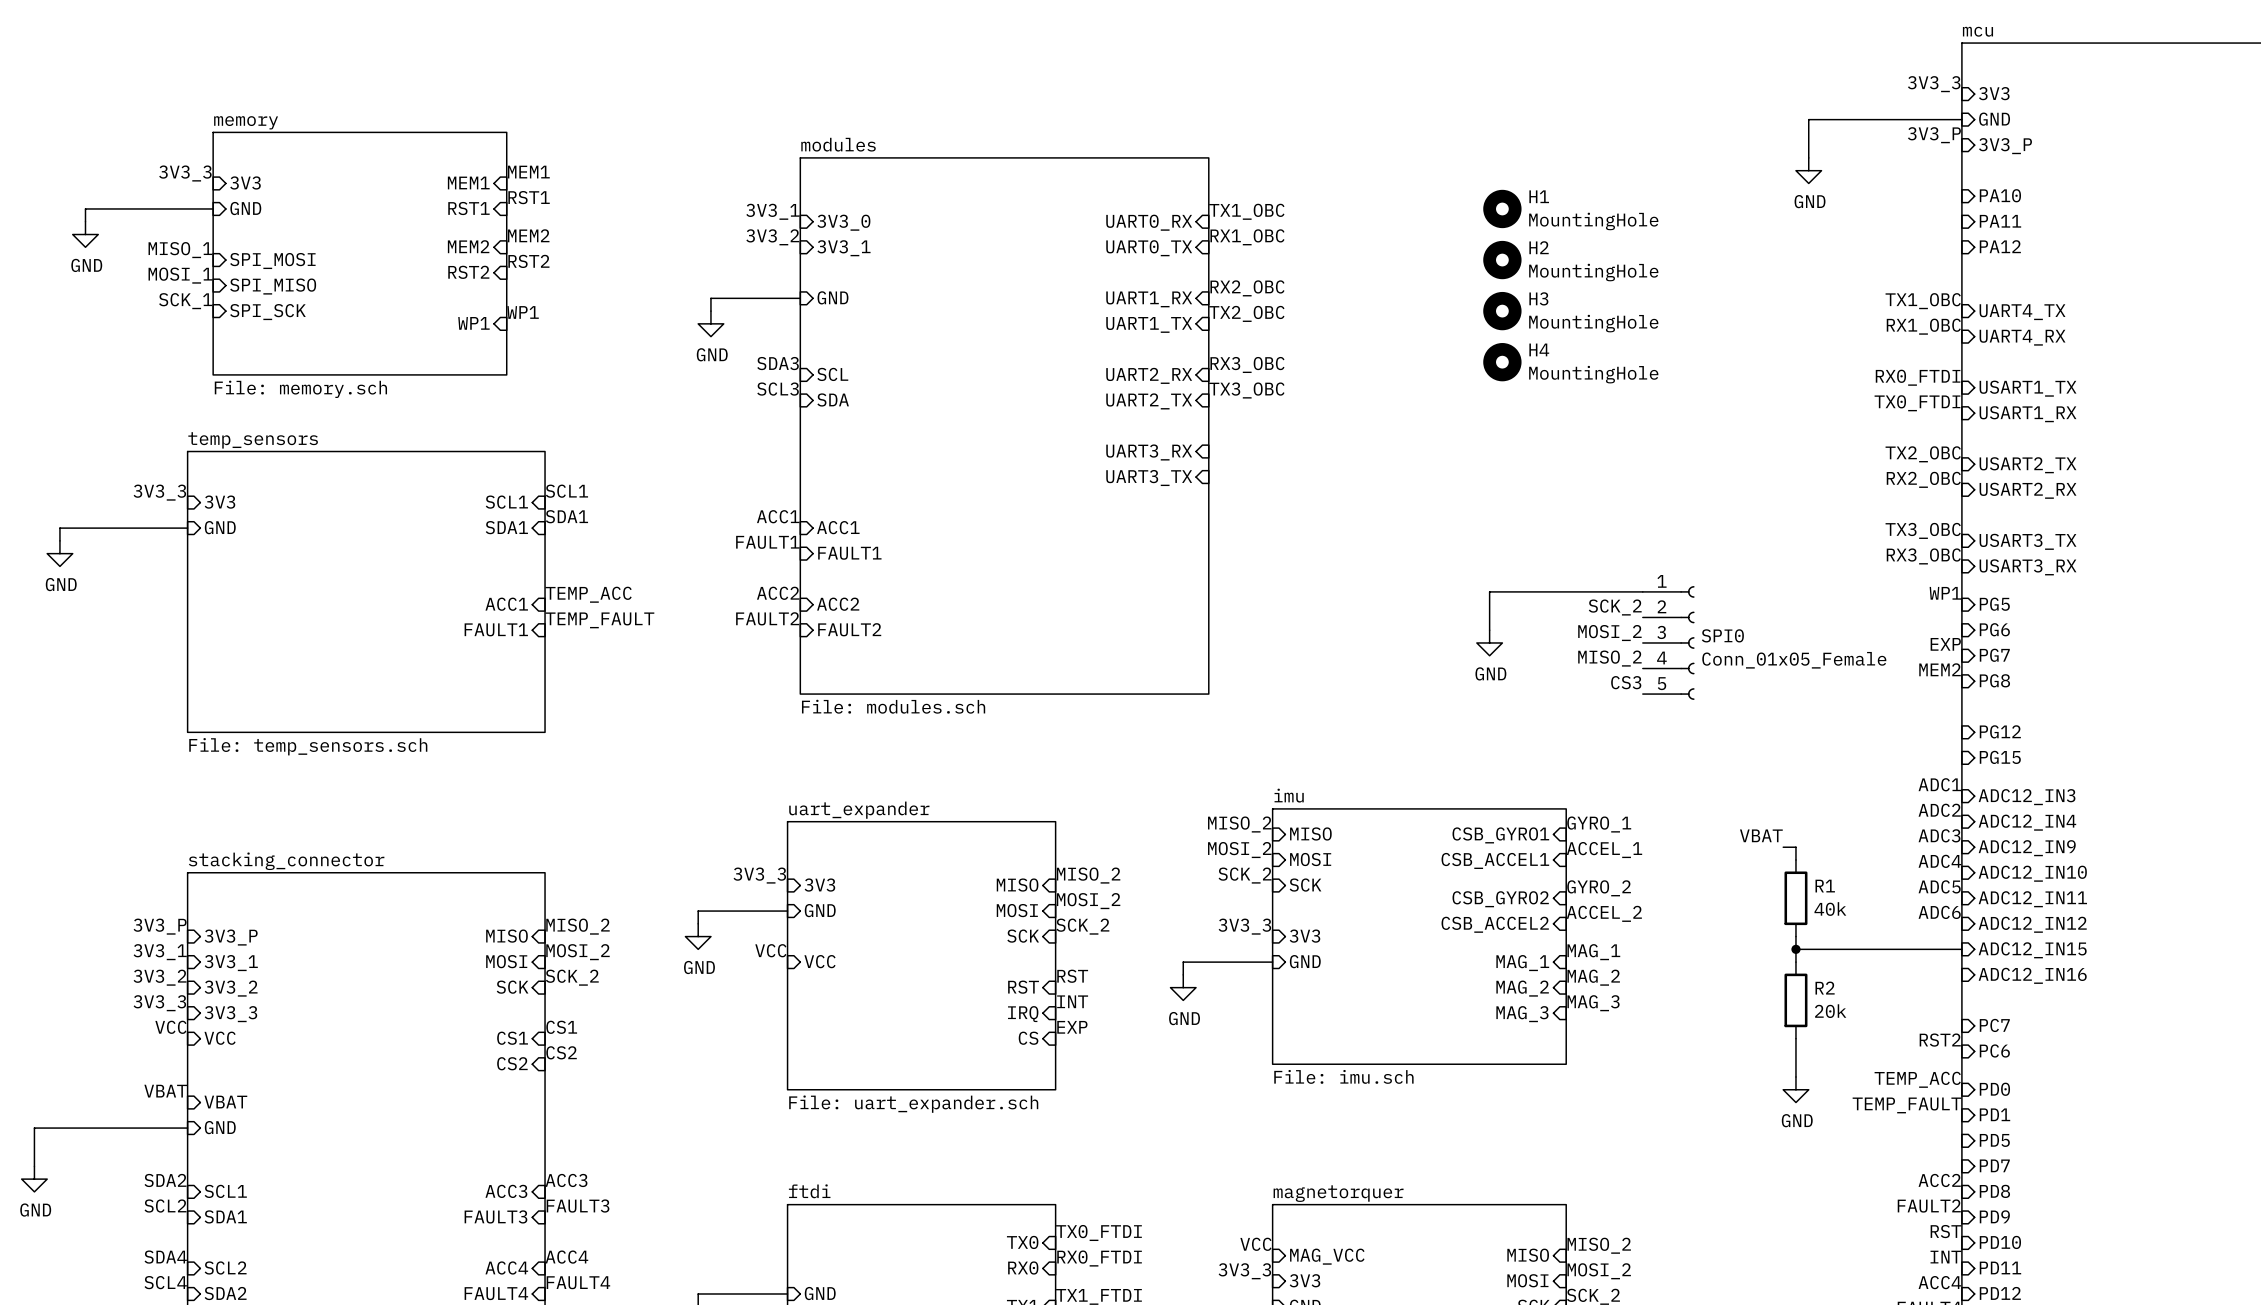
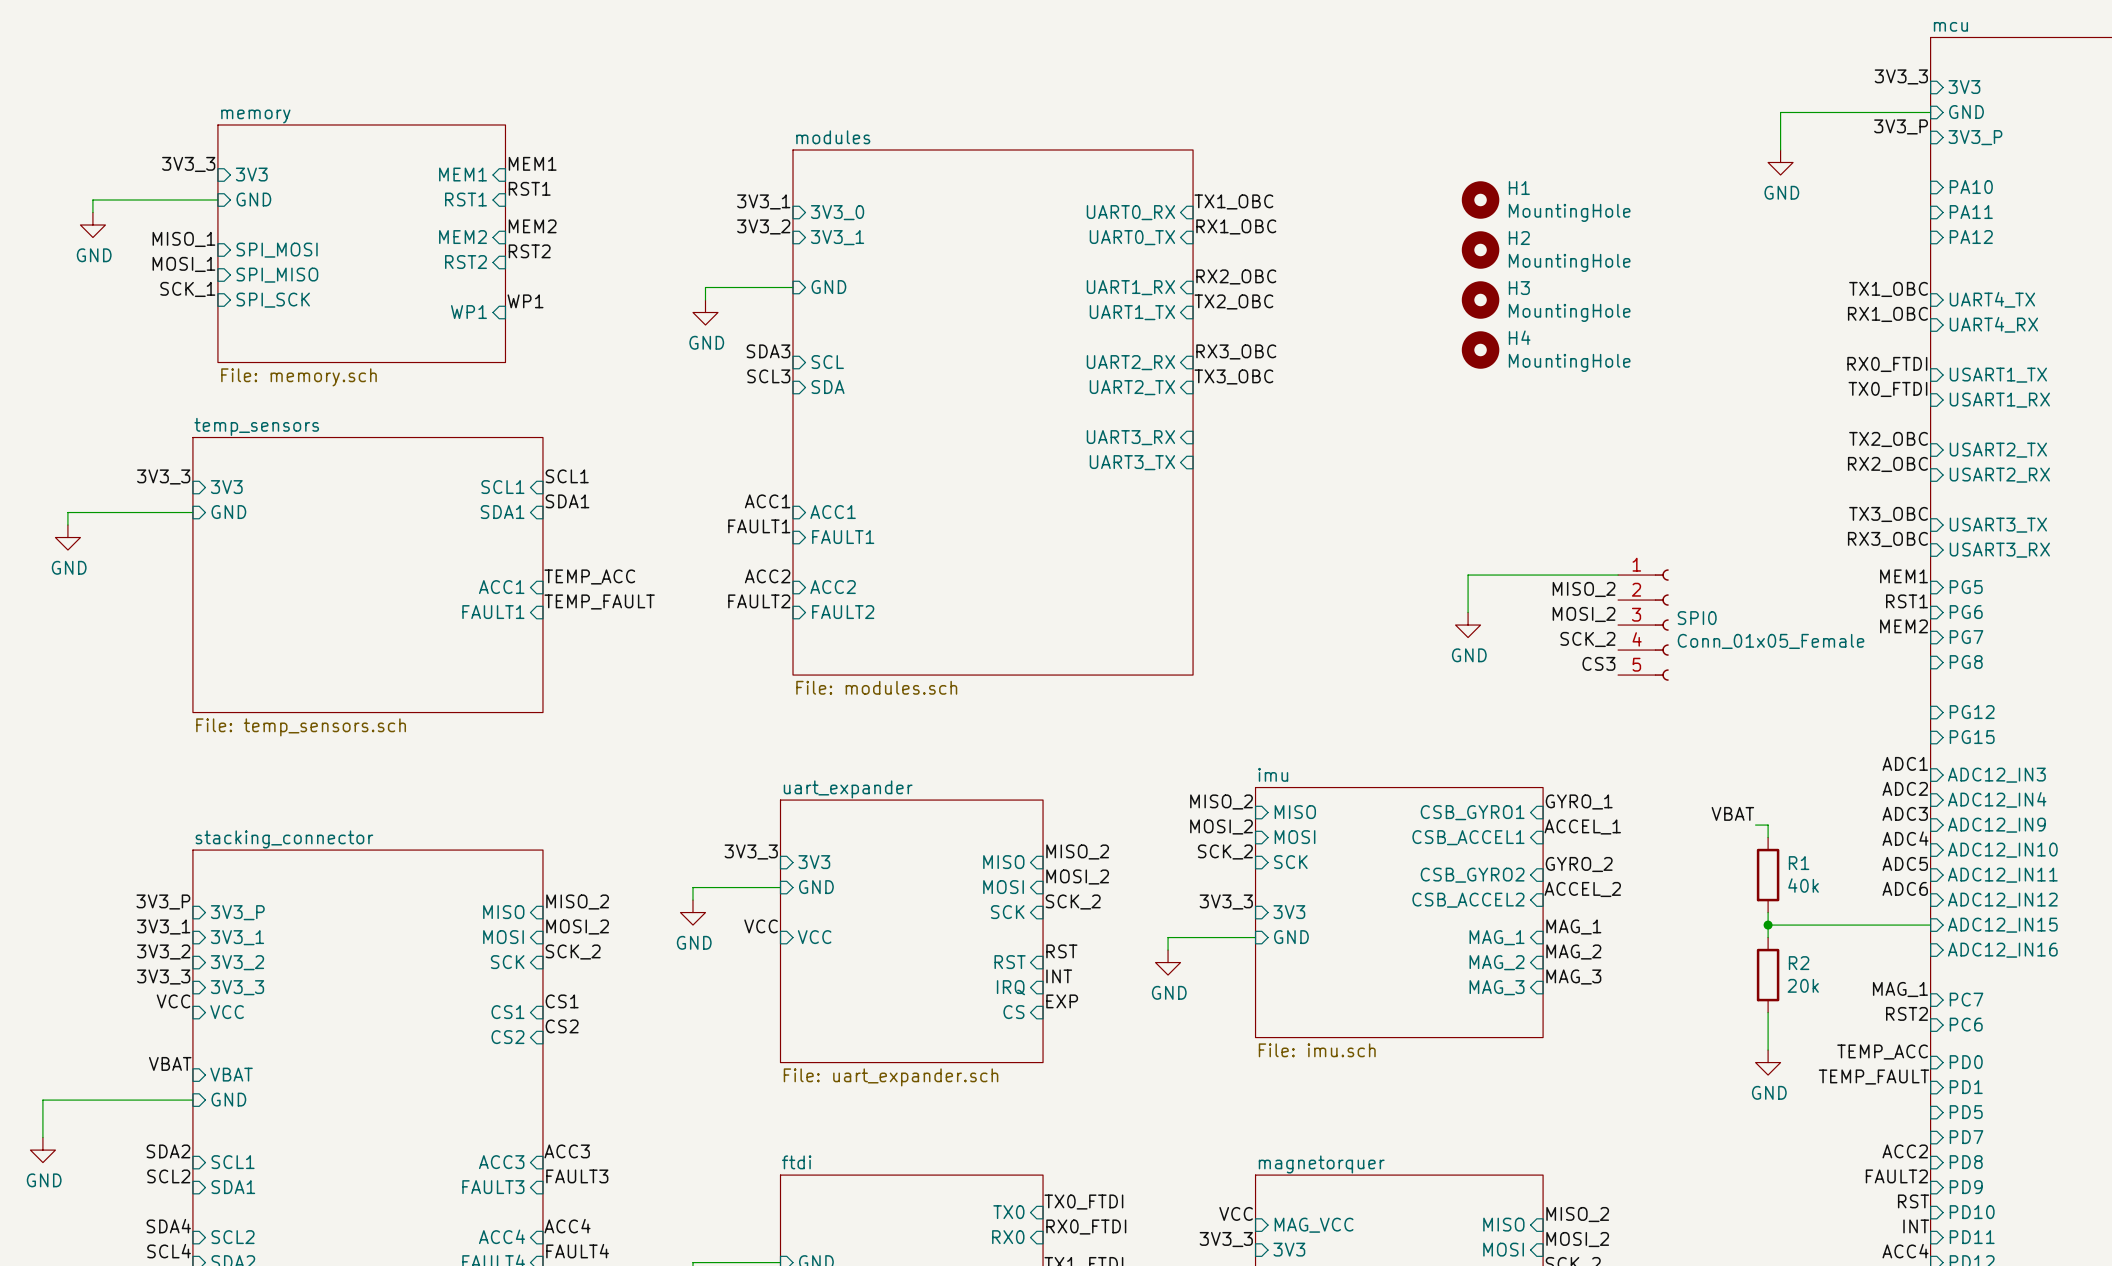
label: WP1 (1945, 593) -> MEM1 (1904, 576)
label: SCK_2 (1615, 607) -> MISO_2 (1584, 589)
label: none -> RST1 (1906, 601)
label: EXP (1945, 644) -> MEM2 (1904, 626)
label: MISO_2 (1609, 658) -> SCK_2 (1587, 639)
label: MEM2 (1940, 669) -> none
label: none -> MAG_1 (1900, 989)

